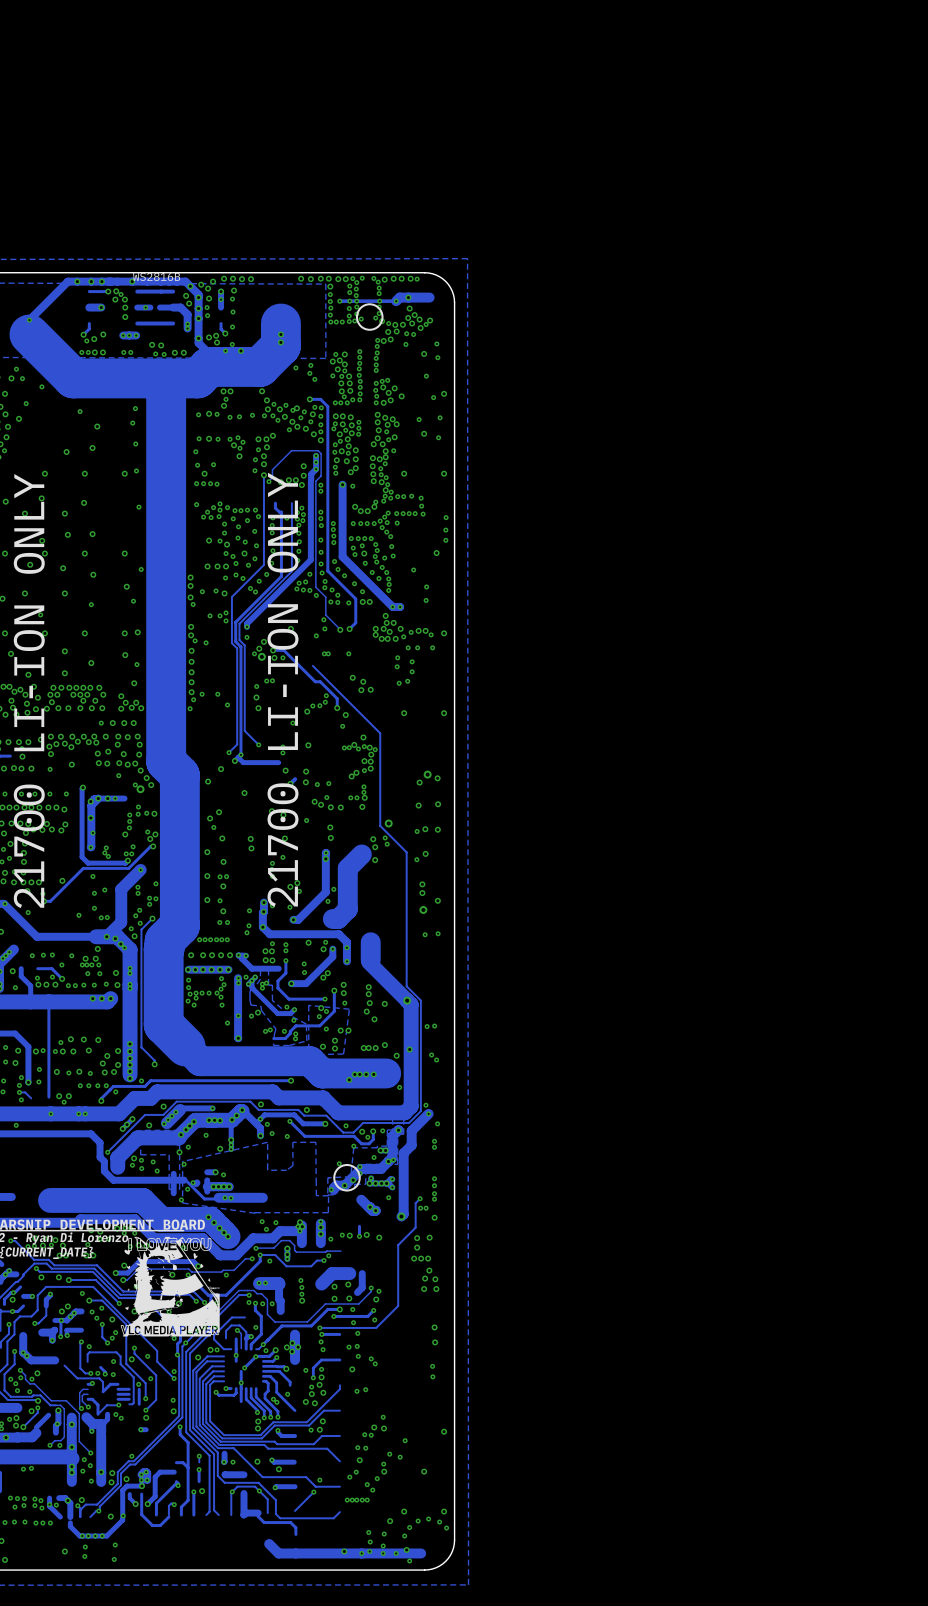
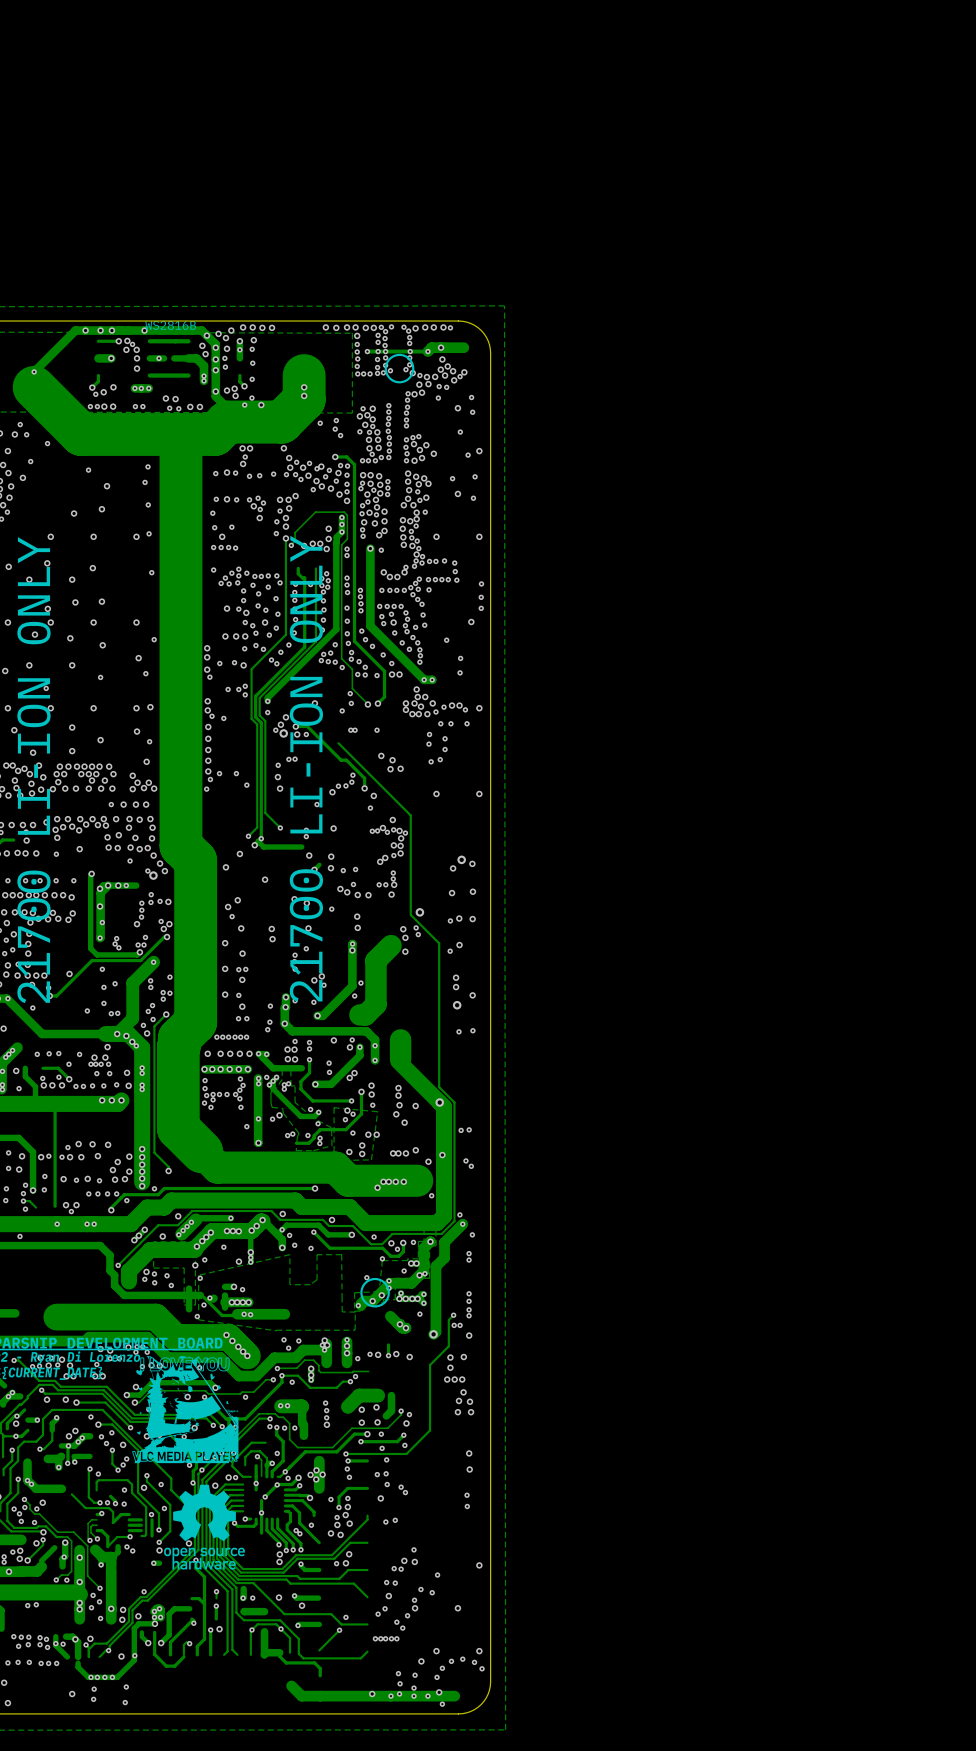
drawing: none -> [164, 1484, 245, 1570]

